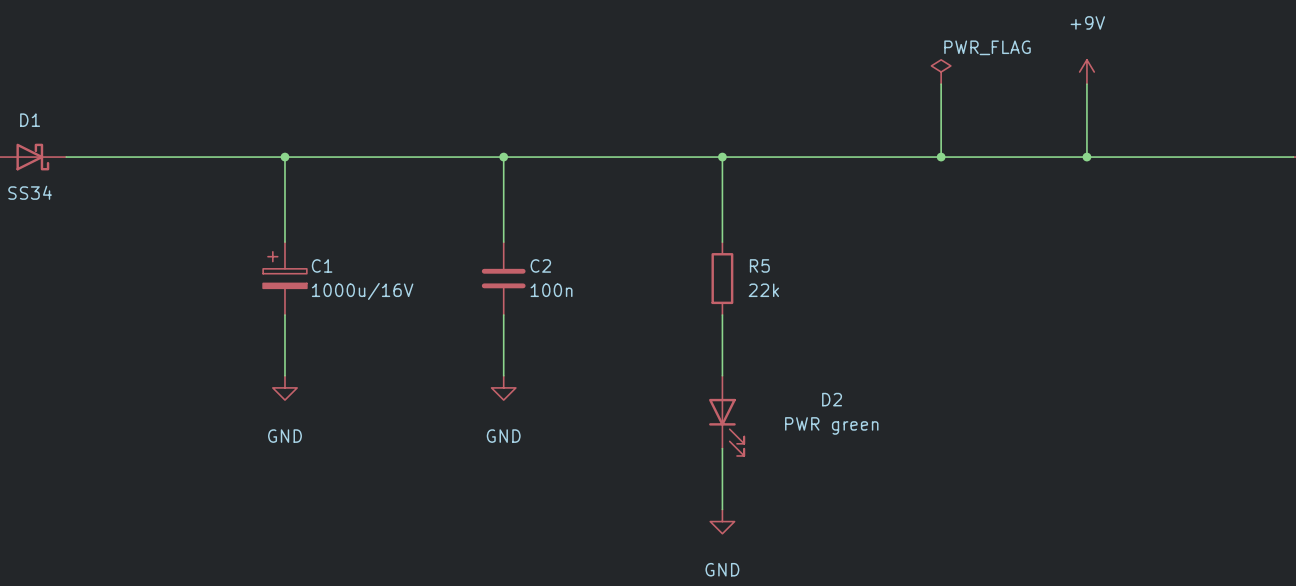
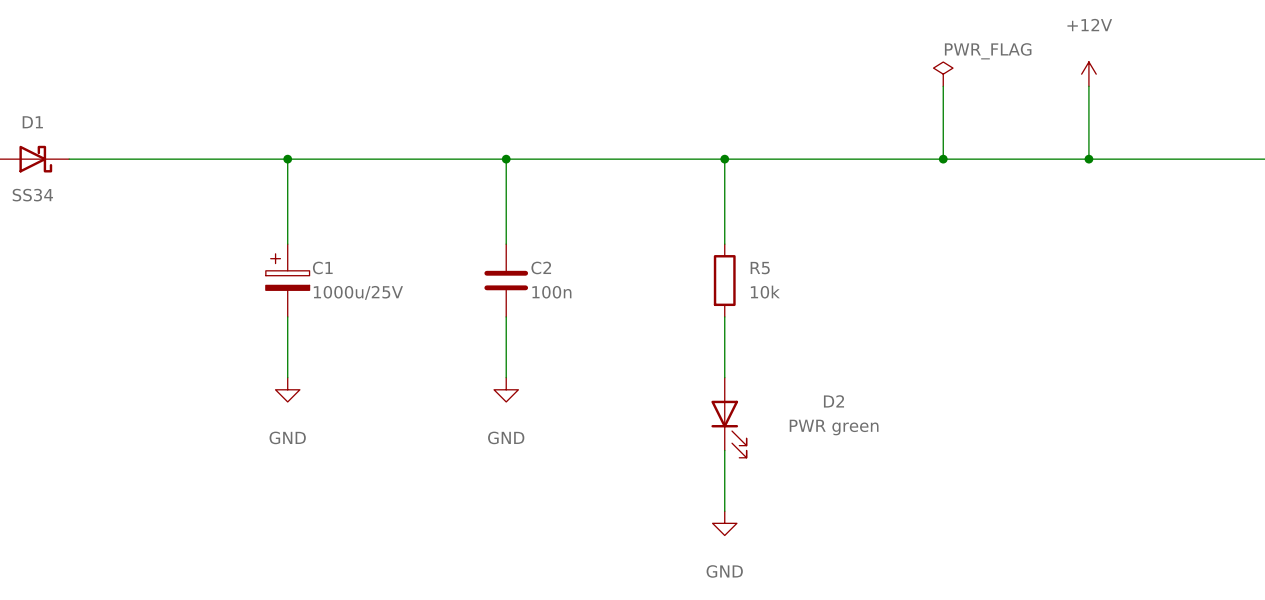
power symbol: +9V (1086, 72) -> +12V (1088, 74)
R5 value: 22k (763, 290) -> 10k (765, 292)
C1 value: 1000u/16V (362, 291) -> 1000u/25V (358, 292)

